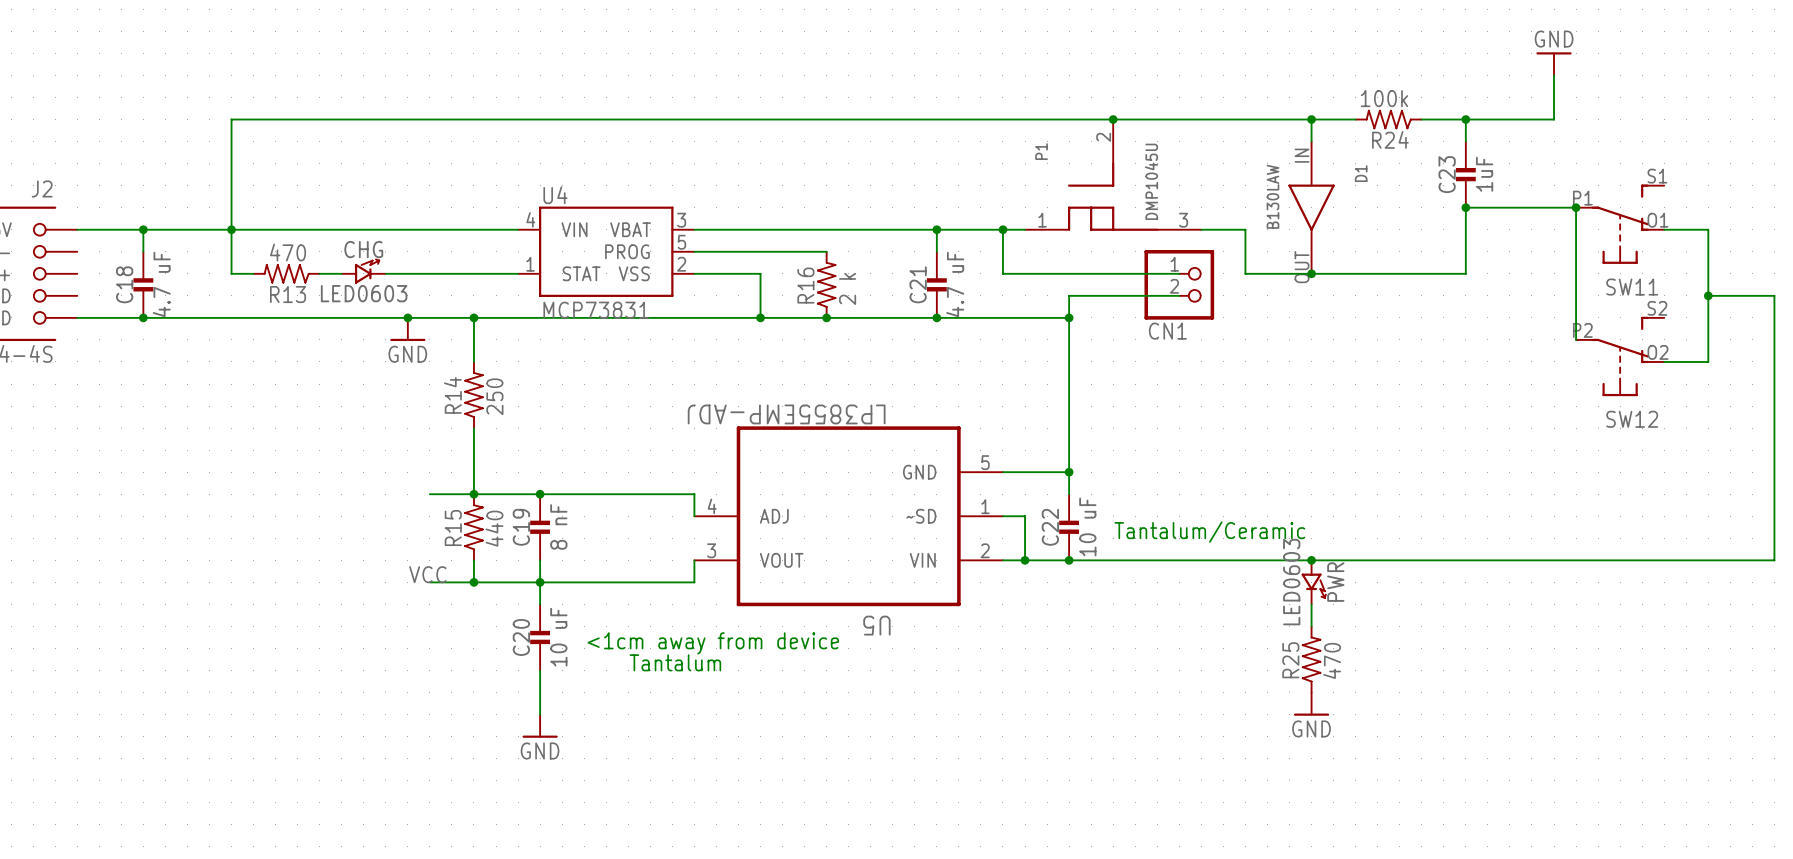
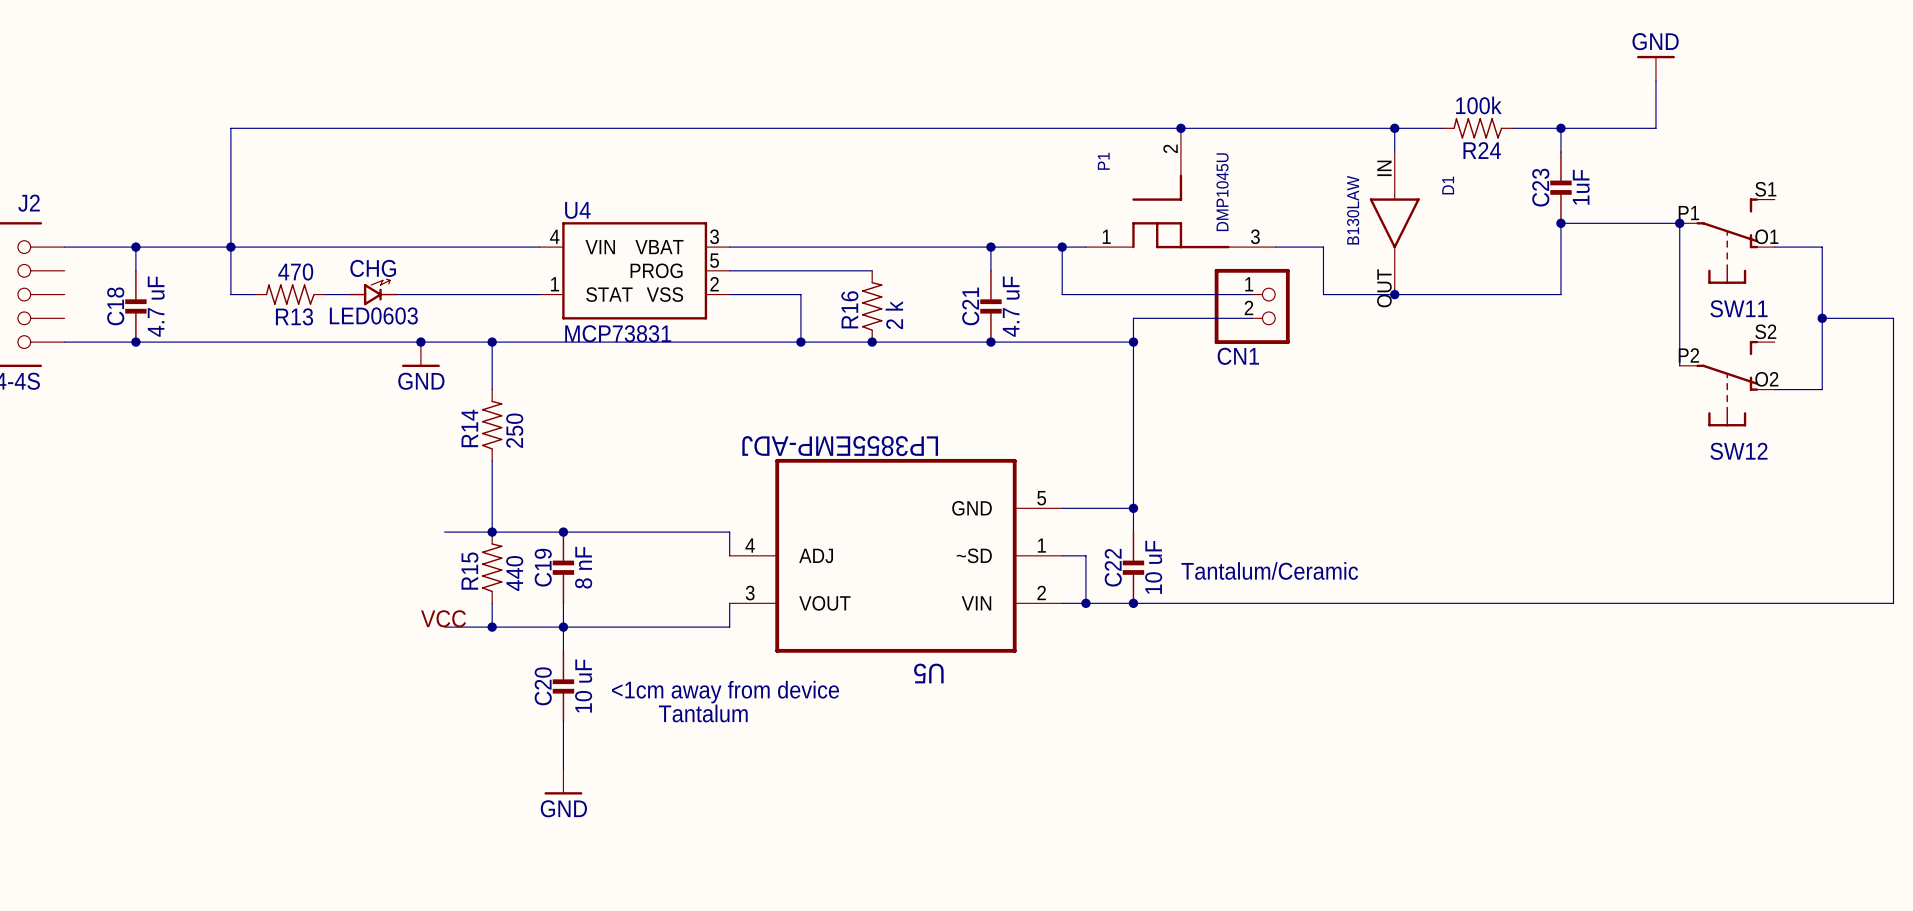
junction: (1311, 560) -> none
PWR: LED0603 (1314, 582) -> none
wire: (1311, 604) (1311, 626) -> none
R25: 470 (1311, 659) -> none
power symbol: GND (1311, 704) -> none

